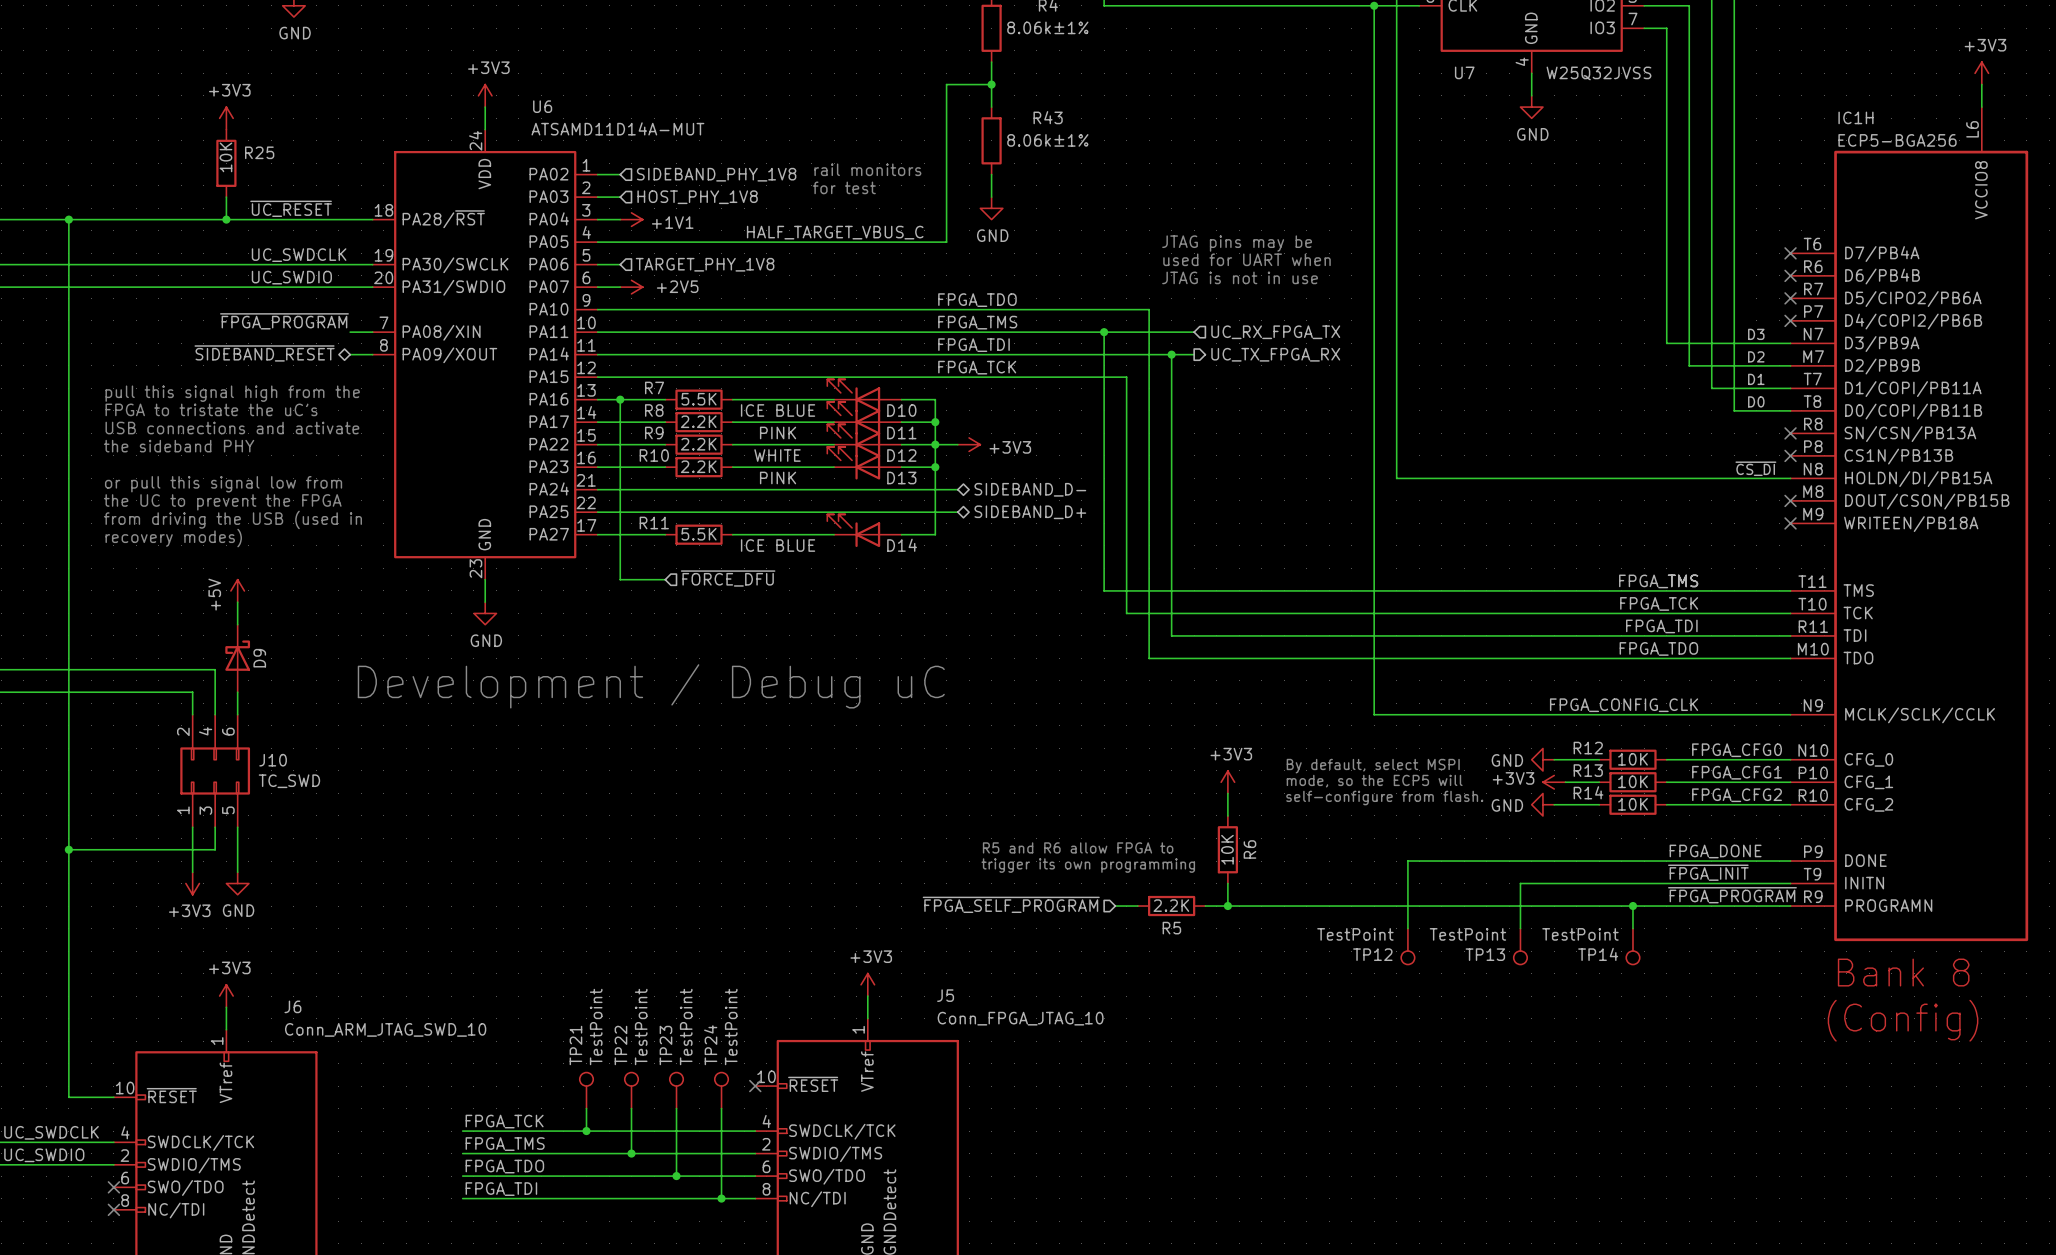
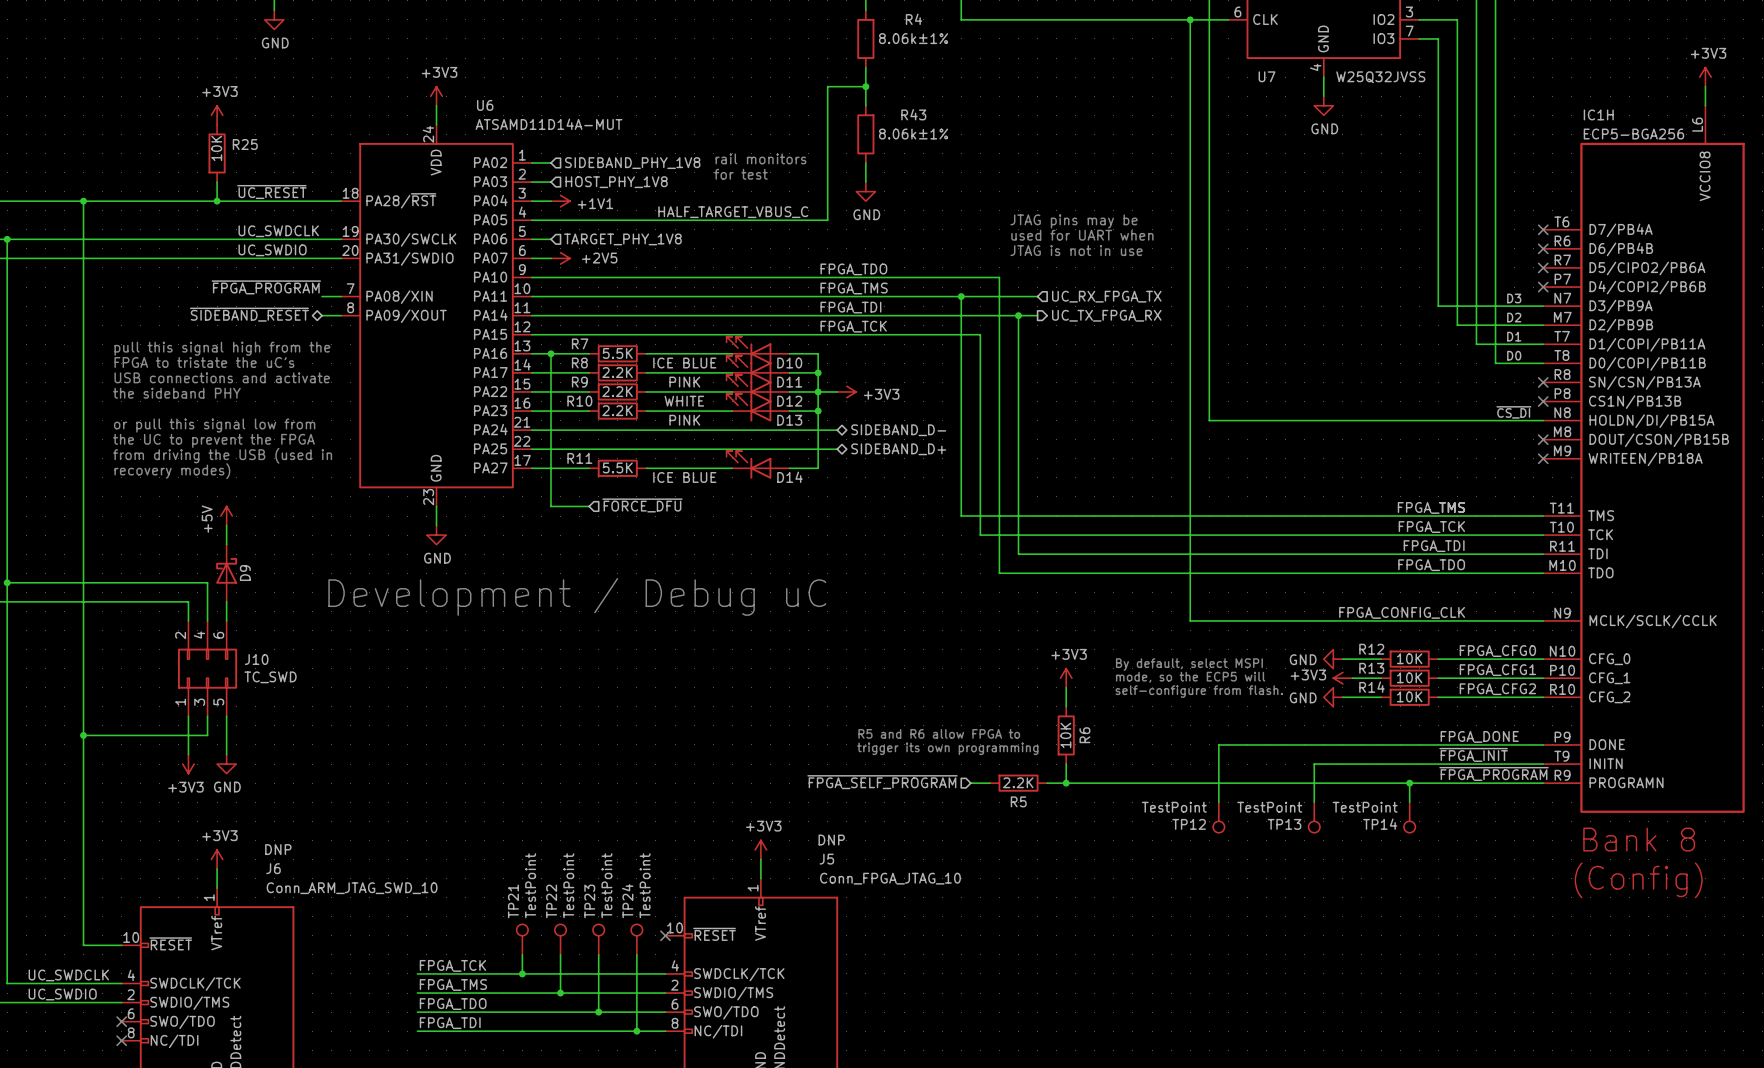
J5 text: none -> DNP (831, 840)
J6 text: none -> DNP (278, 849)

